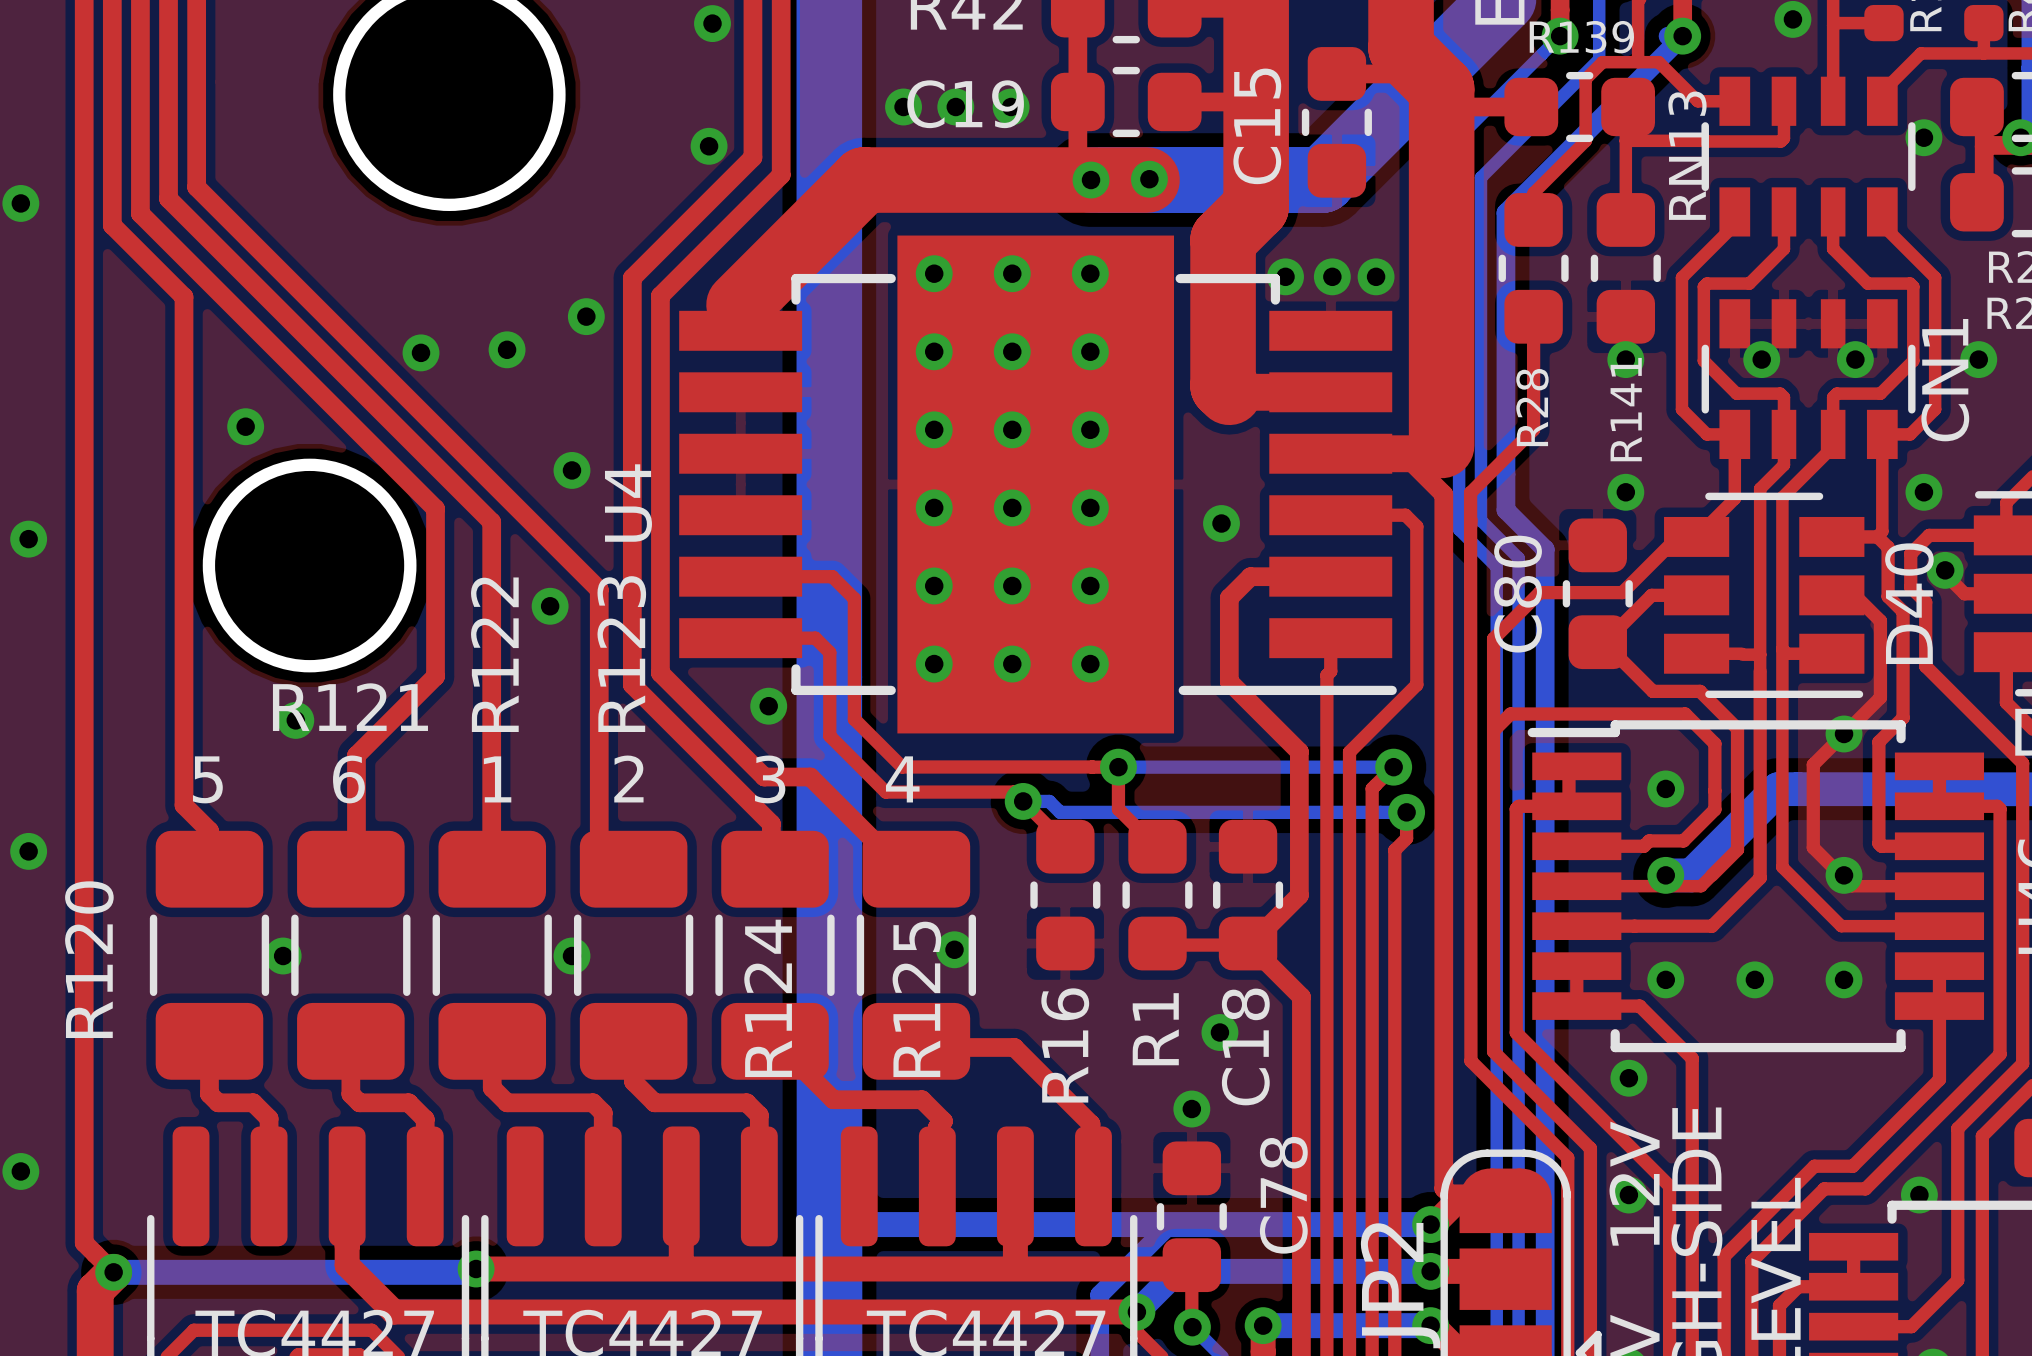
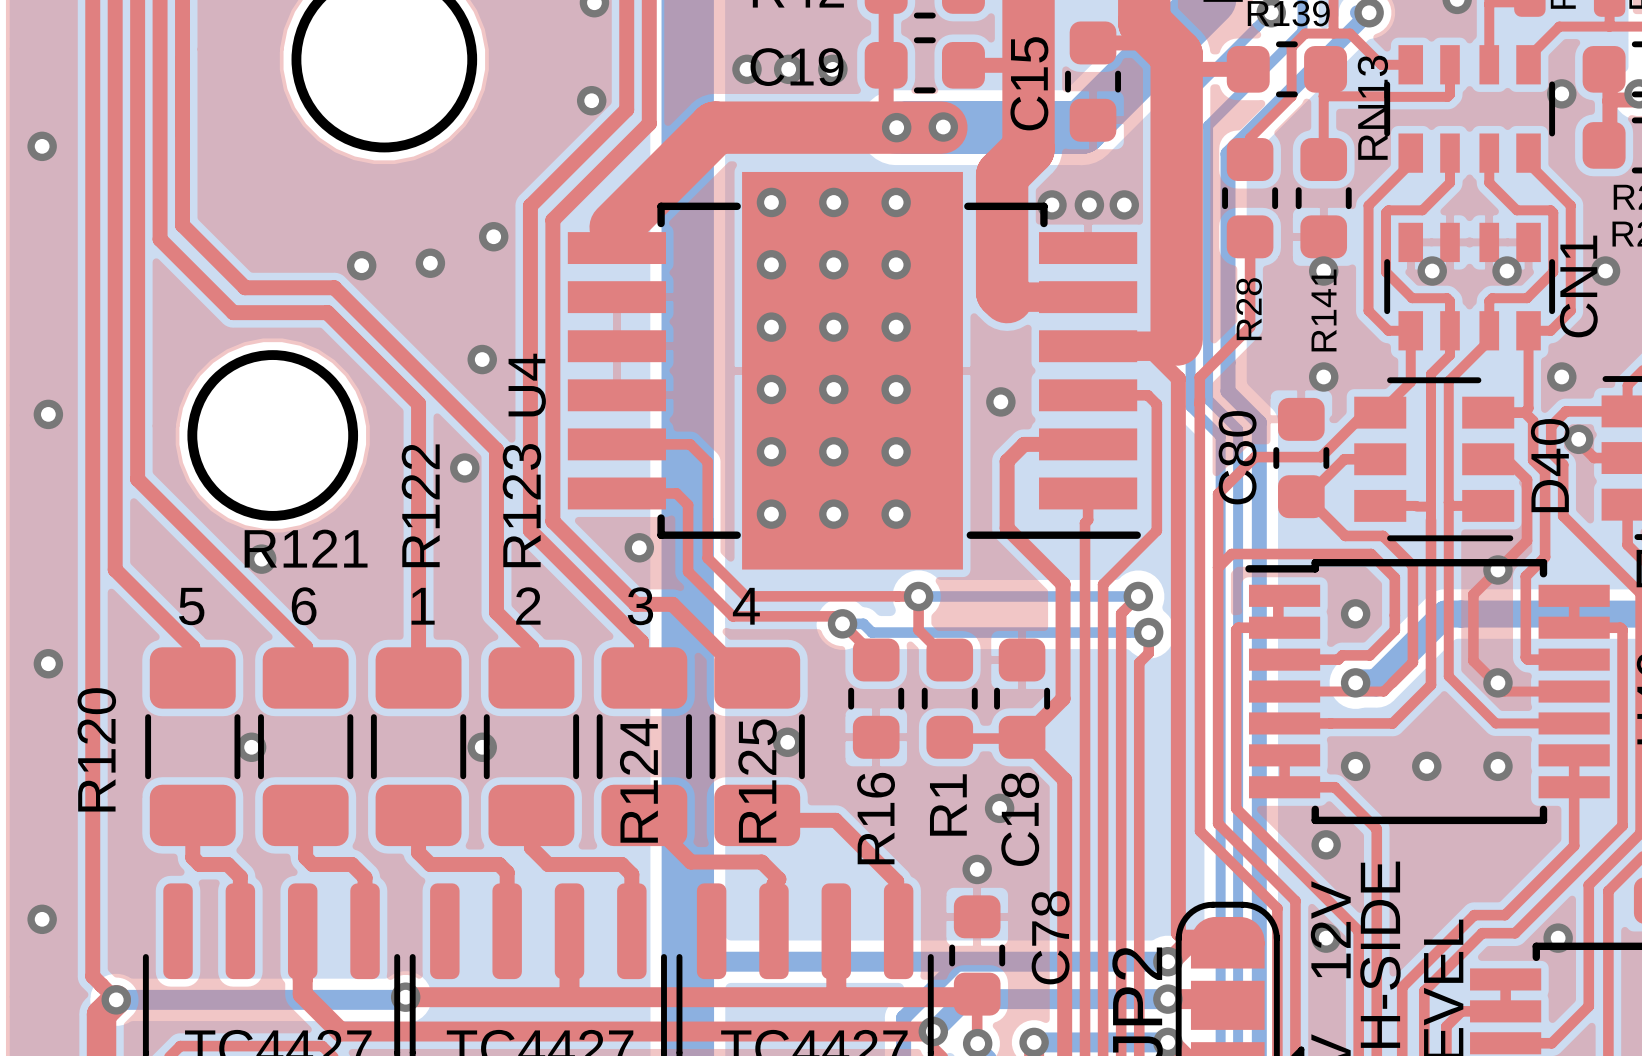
top track: (196, 187) (599, 589) (599, 869) -> (182, 133) (182, 225) (245, 287) (334, 287) (496, 449) (496, 612) (531, 647) (531, 677)
top track: (168, 198) (491, 522) (491, 869) -> (160, 142) (160, 239) (233, 312) (327, 312) (418, 403) (418, 677)
top track: (140, 213) (435, 508) (435, 676) (356, 755) (356, 863) (350, 869) -> (137, 154) (137, 479) (305, 647) (305, 677)
top track: (112, 225) (184, 297) (184, 805) -> (115, 163) (115, 569) (172, 626)
via: (245, 426) -> none

